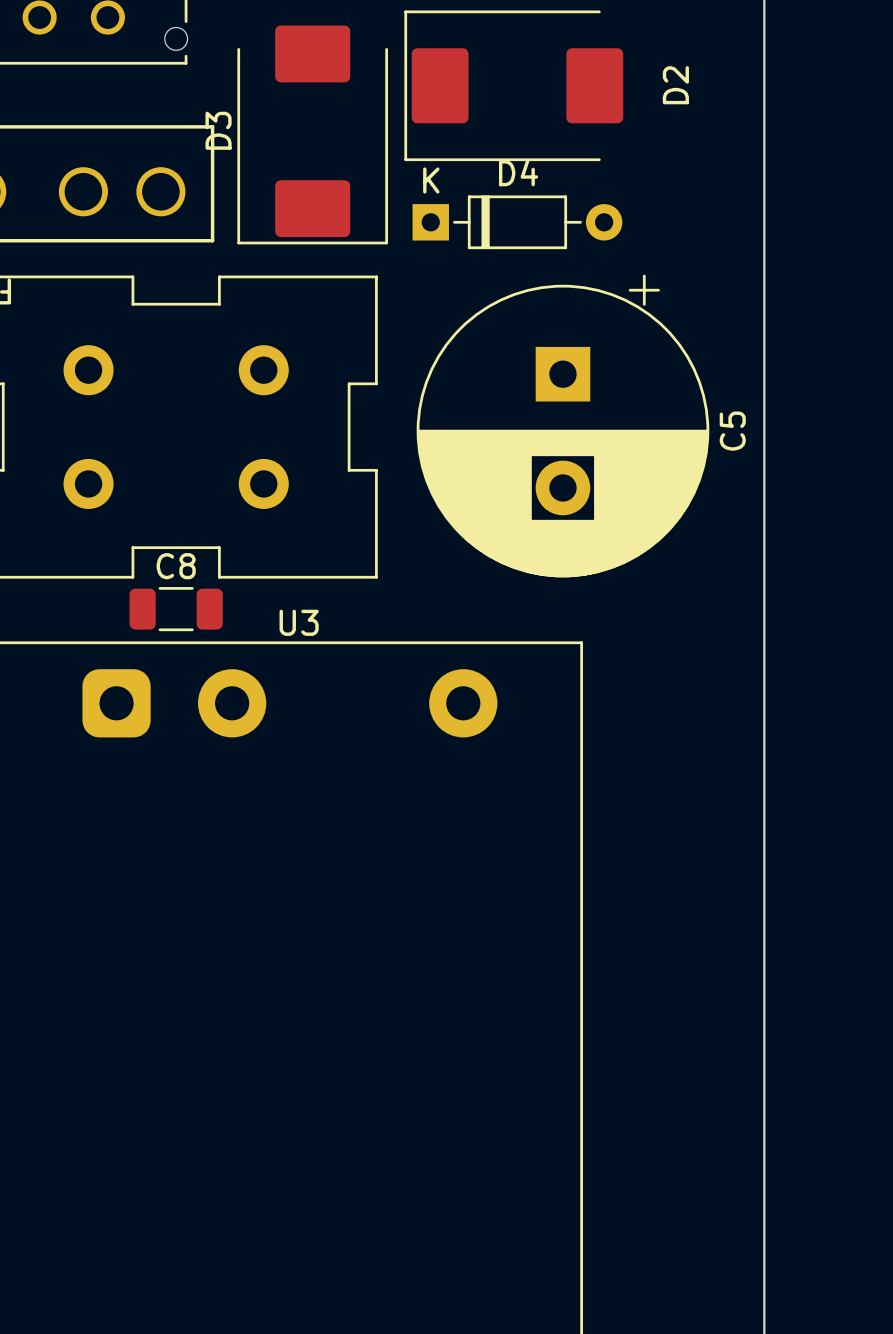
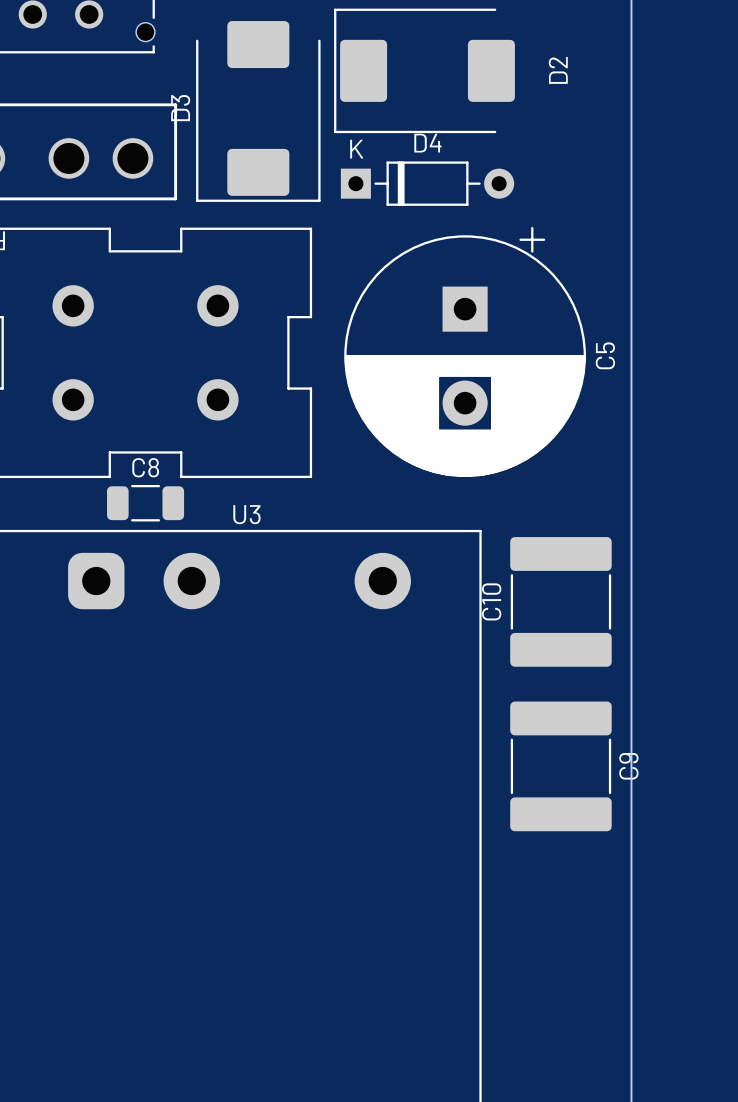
C10: none -> (560, 601)
C9: none -> (560, 766)

